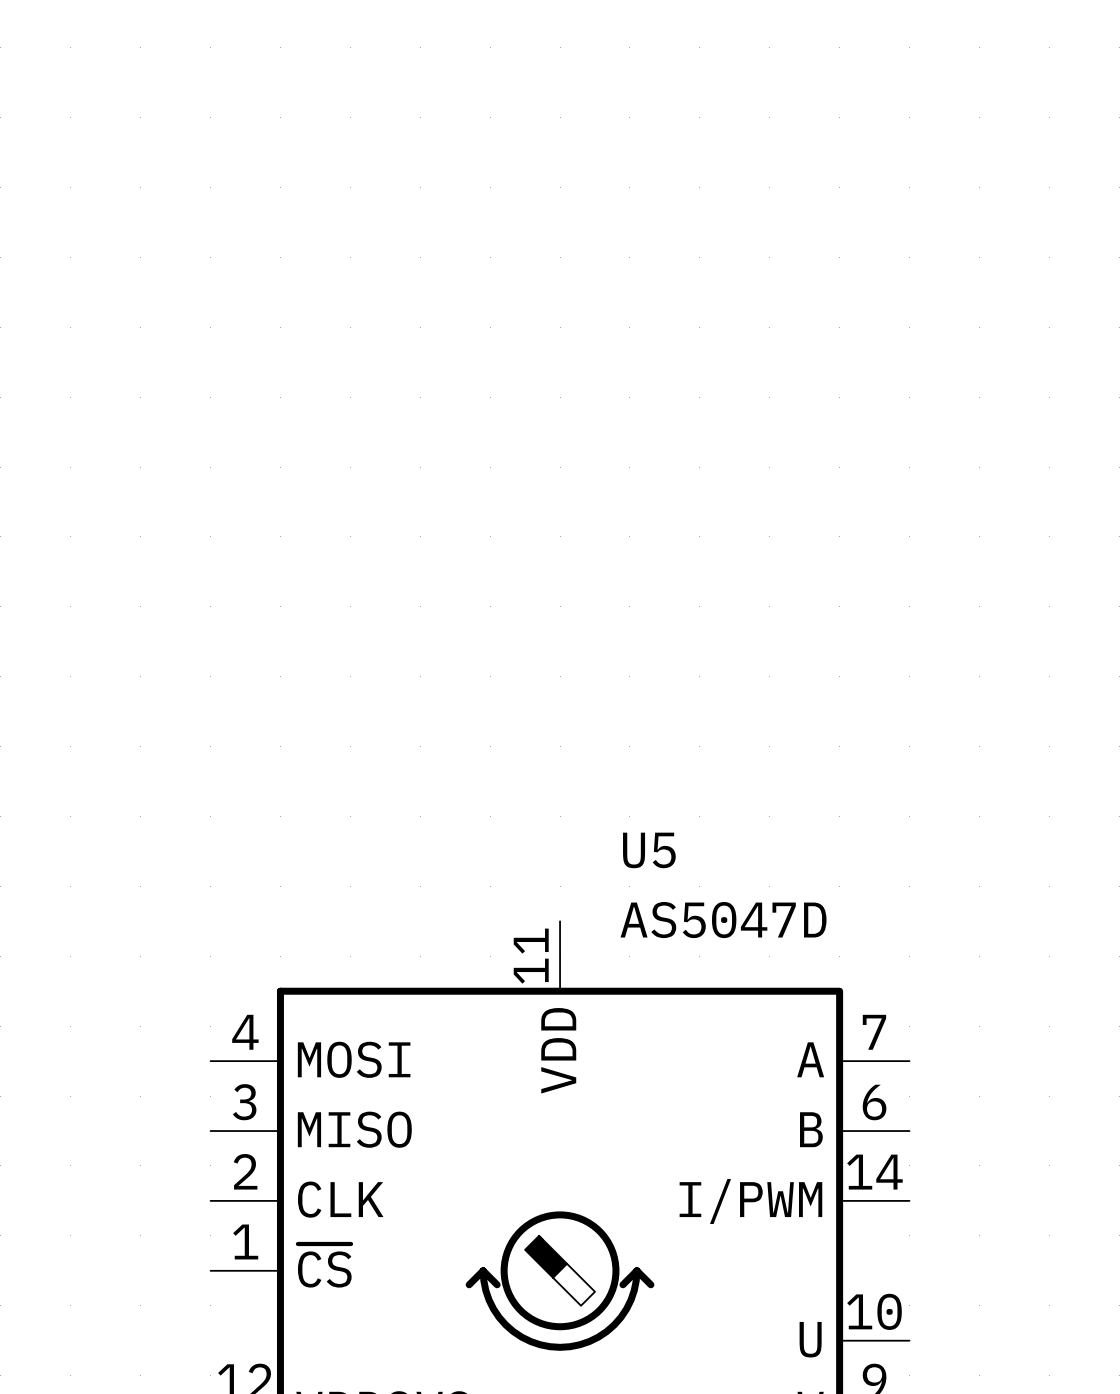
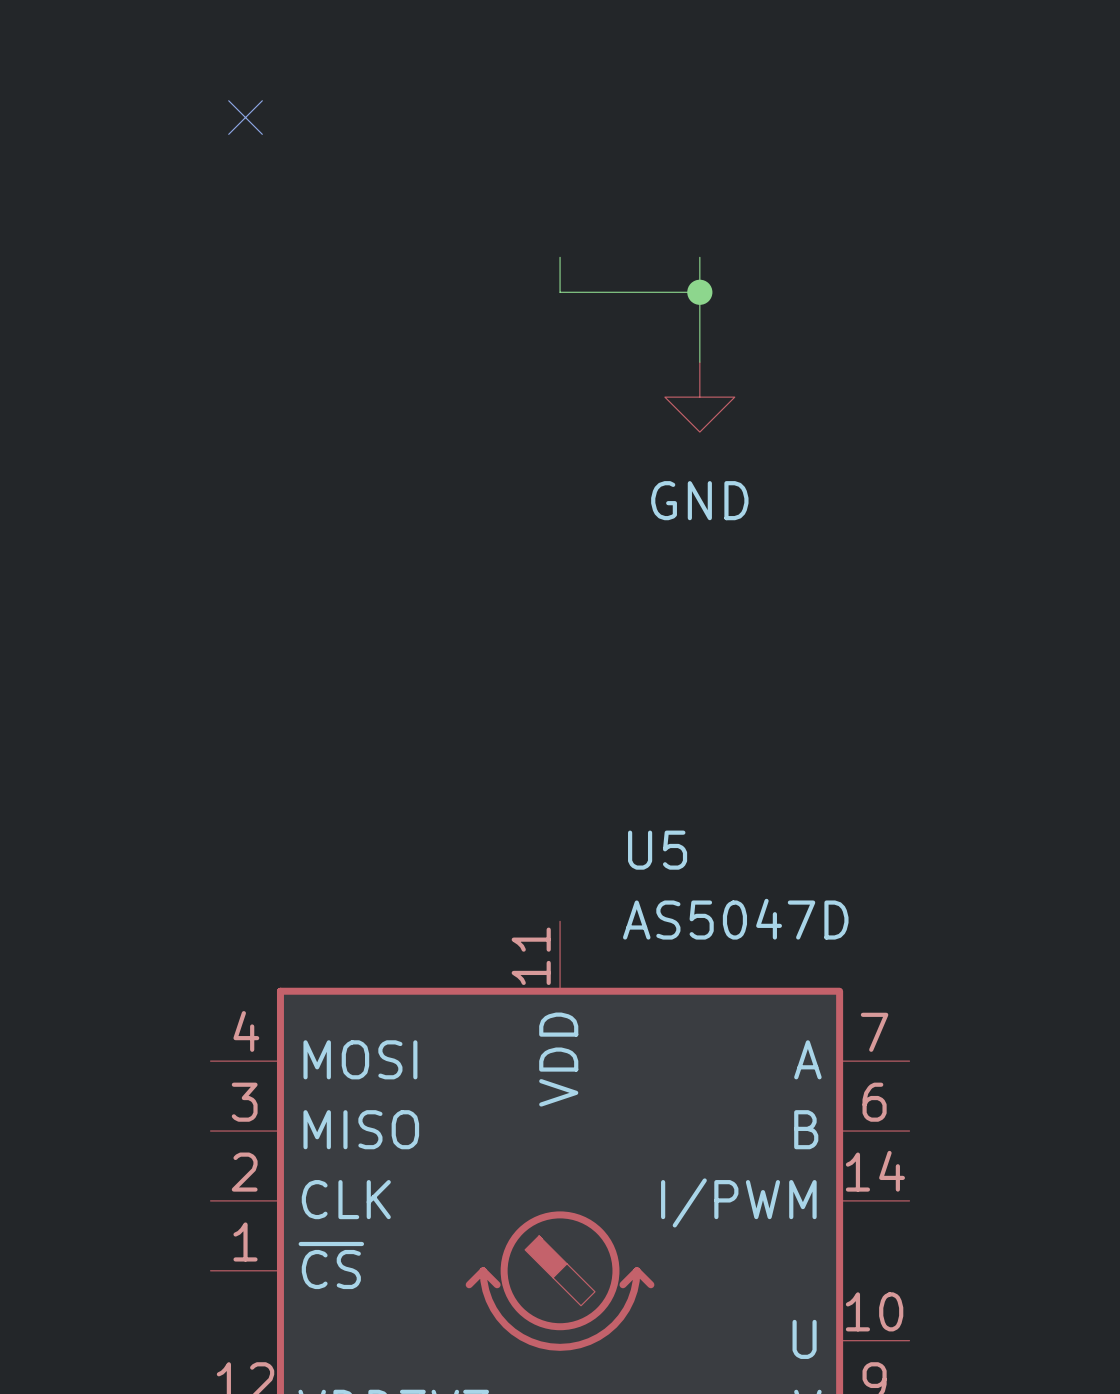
no-connect mark: none -> (245, 117)
wire: none -> (560, 257) (560, 292) (699, 292)
wire: none -> (699, 257) (699, 362)
junction: none -> (699, 292)
power symbol: none -> GND (699, 397)

